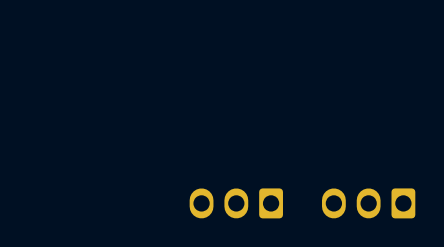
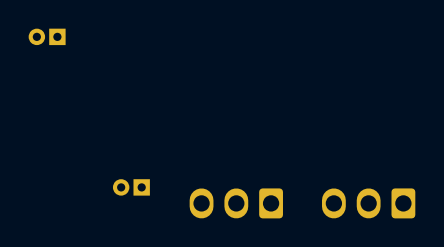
part: none -> (47, 36)
part: none -> (131, 187)

